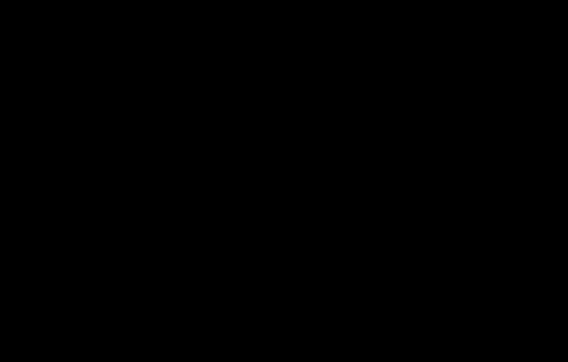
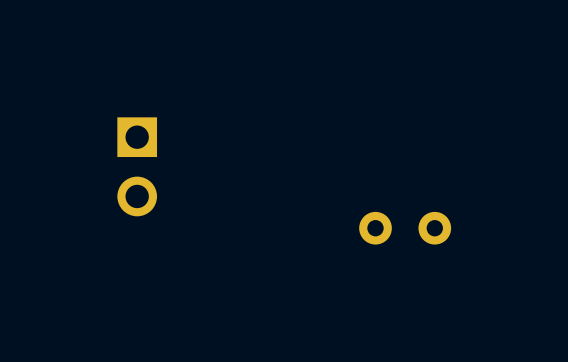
part: none -> (137, 166)
part: none -> (405, 228)

